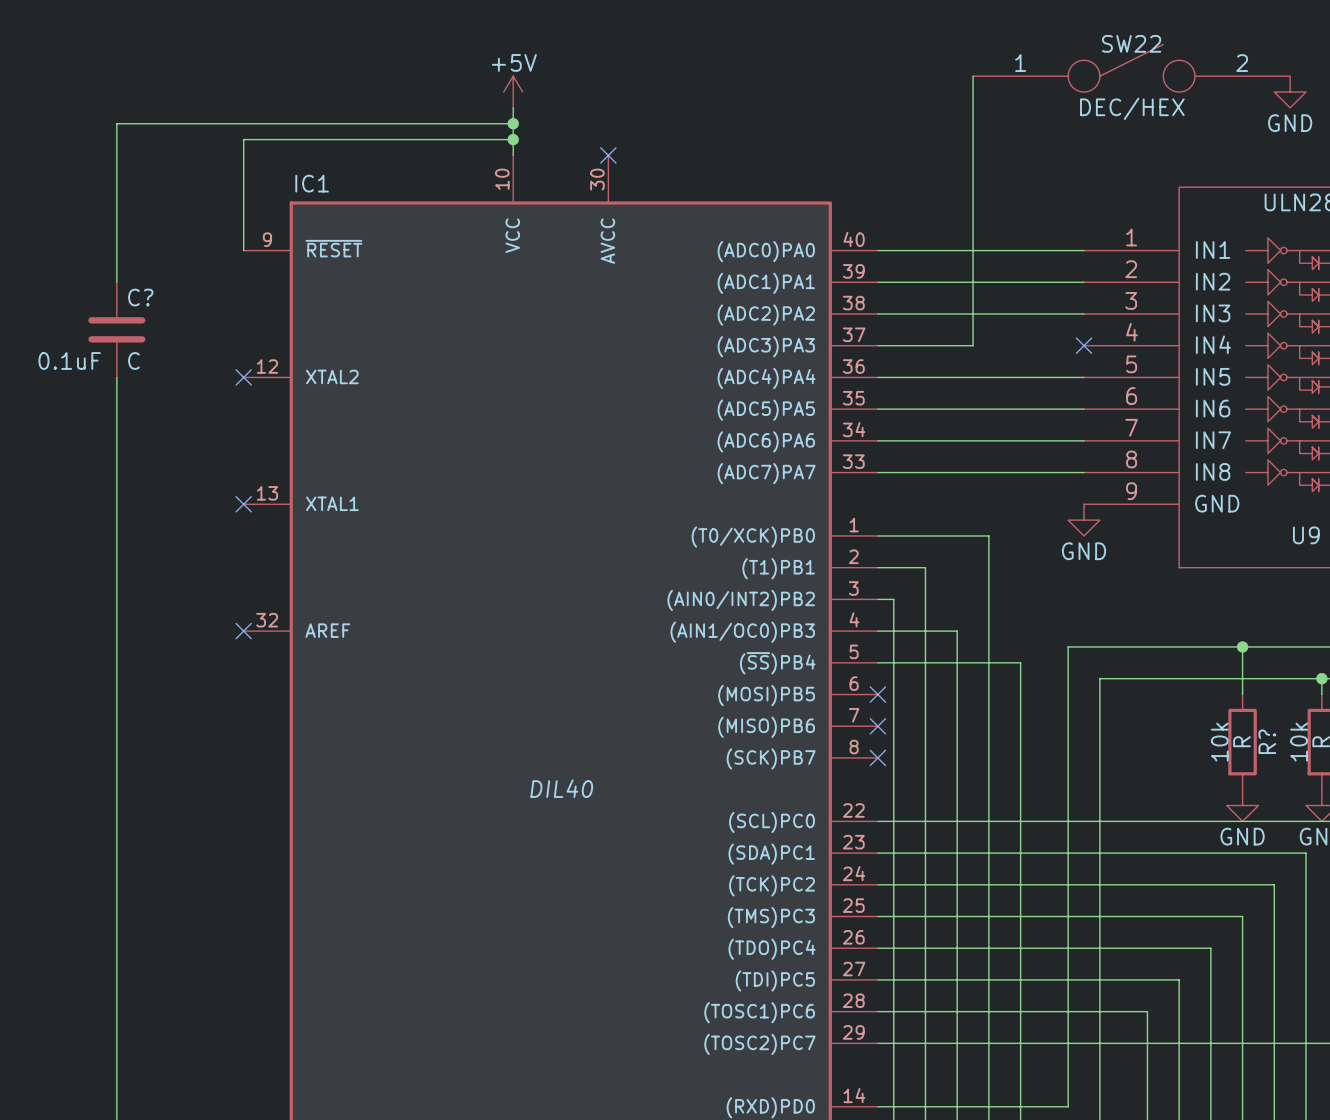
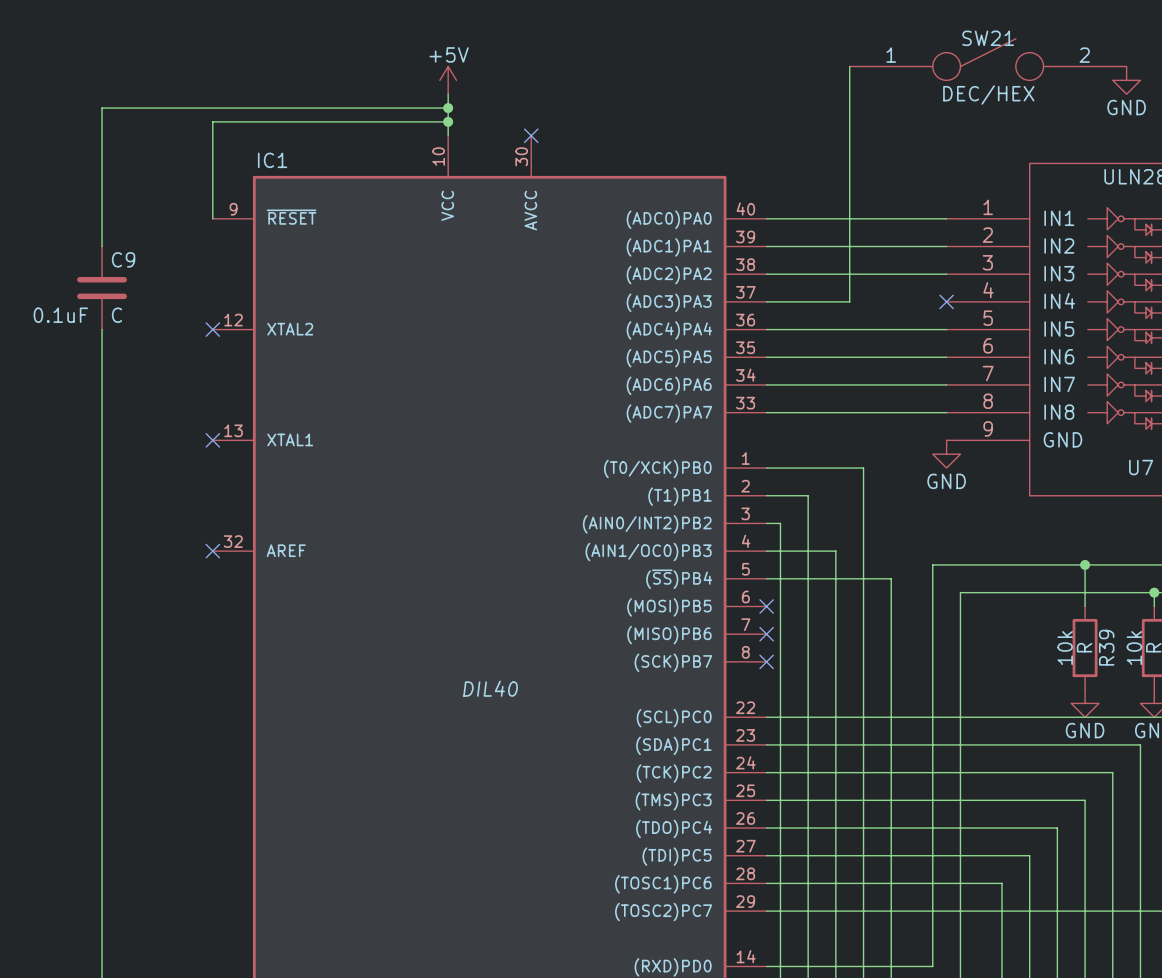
SW22 name: SW22 (1131, 43) -> SW21 (988, 38)
C? name: C? (140, 297) -> C9 (123, 259)
U9 name: U9 (1306, 535) -> U7 (1141, 467)
R? name: R? (1267, 741) -> R39 (1106, 647)

